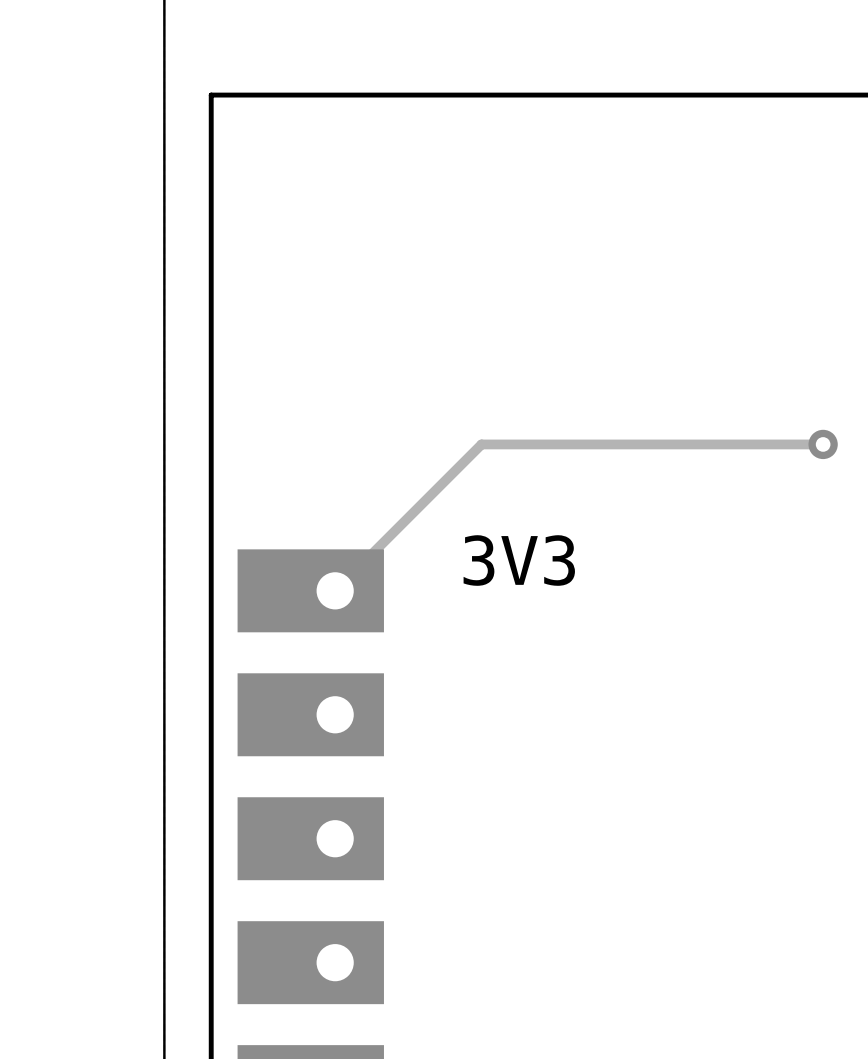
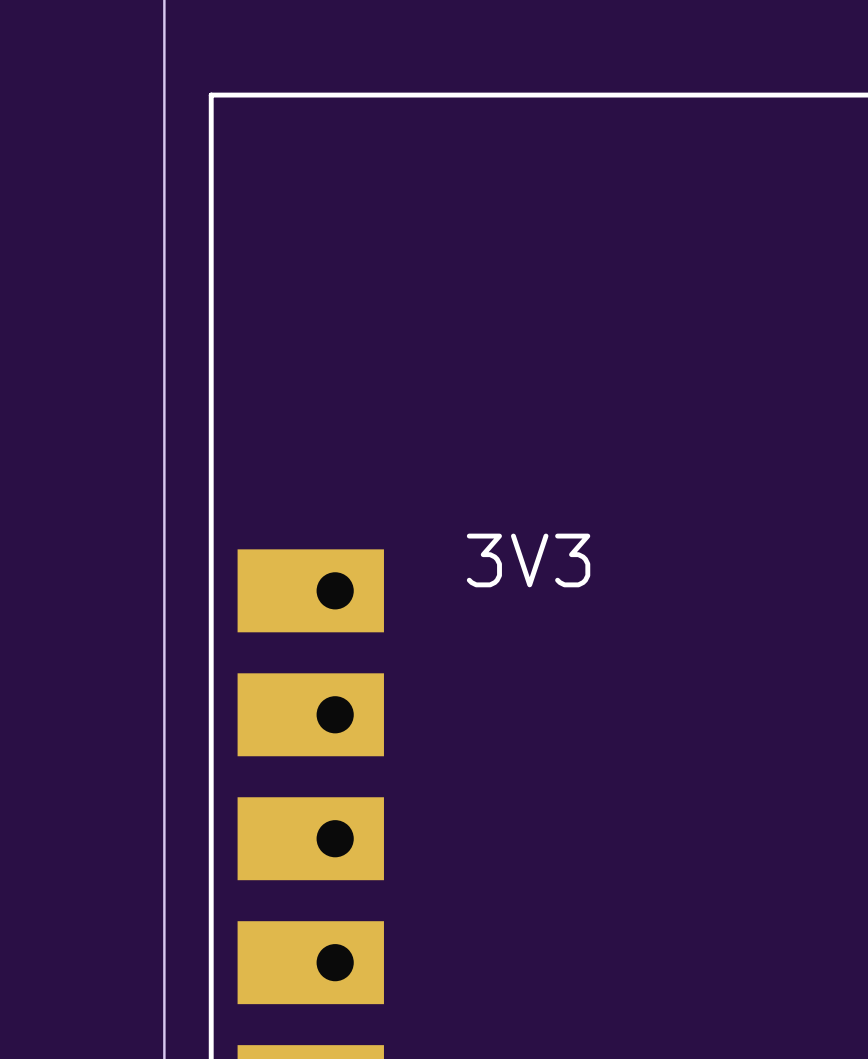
track: (823, 444) (481, 444) (335, 590) -> none
via: (823, 444) -> none

